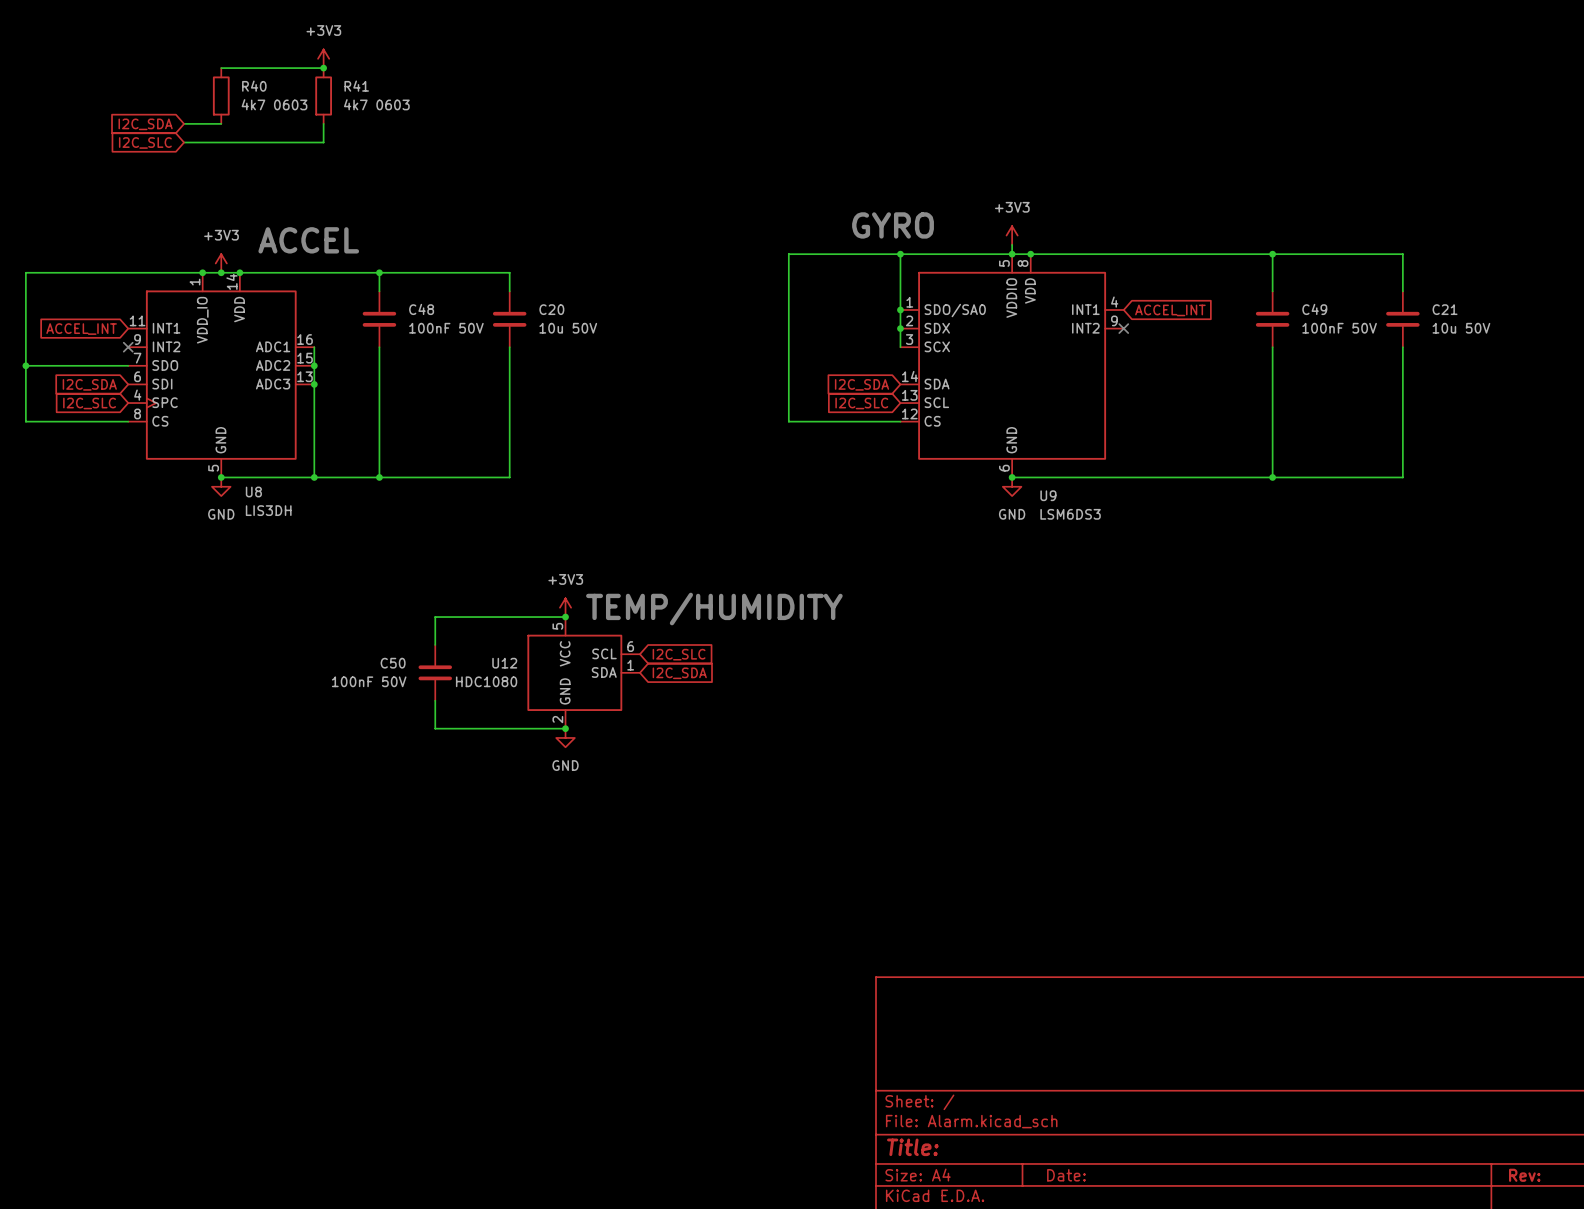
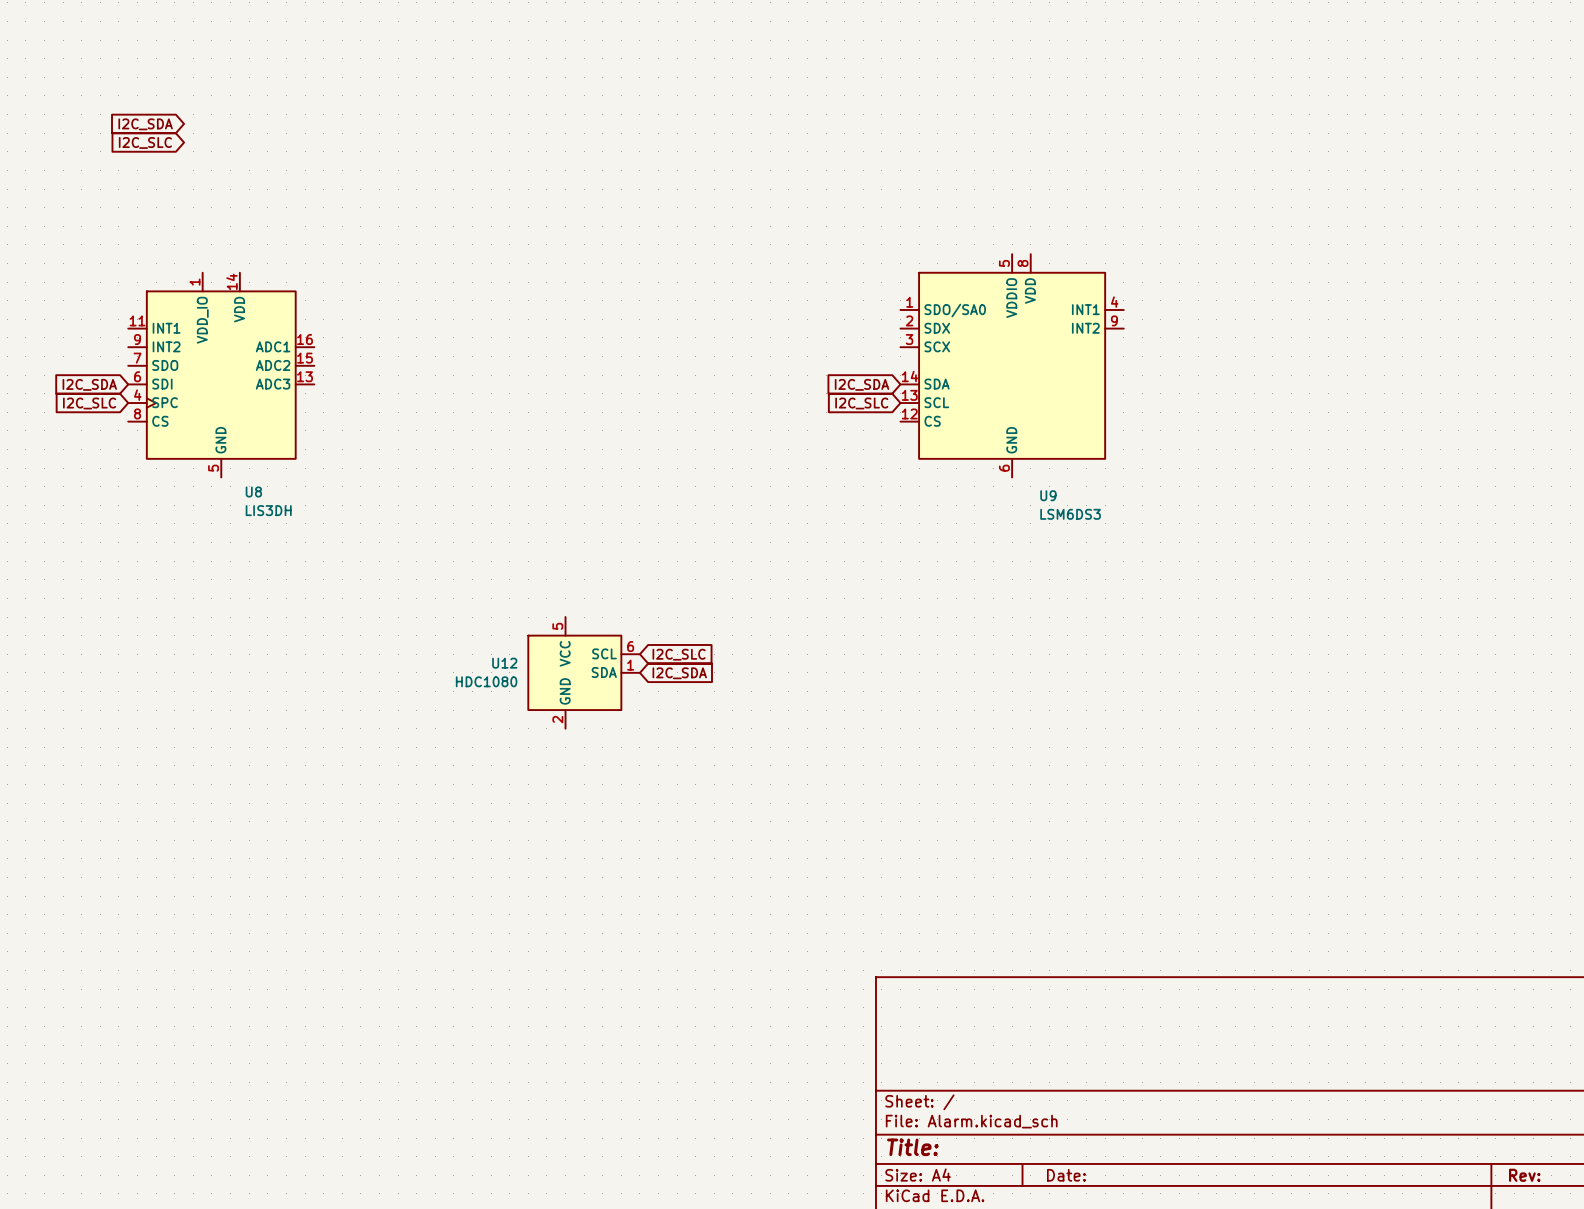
power symbol: +3V3 (323, 58) -> none
wire: (221, 68) (323, 68) -> none
junction: (323, 68) -> none
R40: 4k7 0603 (221, 95) -> none
R41: 4k7 0603 (323, 95) -> none
wire: (184, 123) (221, 123) -> none
wire: (323, 123) (323, 142) (184, 142) -> none
text: GYRO (893, 225) -> none
power symbol: +3V3 (1012, 235) -> none
text: ACCEL (308, 240) -> none
wire: (1012, 244) (1012, 254) -> none
wire: (900, 254) (900, 347) -> none
junction: (900, 254) -> none
junction: (1012, 254) -> none
junction: (1030, 254) -> none
wire: (1272, 254) (1272, 291) -> none
junction: (1272, 254) -> none
power symbol: +3V3 (221, 263) -> none
junction: (202, 272) -> none
junction: (221, 272) -> none
junction: (239, 272) -> none
wire: (379, 272) (379, 291) -> none
junction: (379, 272) -> none
wire: (509, 291) (509, 272) (25, 272) (25, 421) (128, 421) -> none
wire: (1402, 291) (1402, 254) (788, 254) (788, 421) (900, 421) -> none
junction: (900, 309) -> none
global label: ACCEL_INT (1170, 310) -> none
C48: 100nF 50V (379, 319) -> none
C20: 10u 50V (509, 319) -> none
C49: 100nF 50V (1272, 319) -> none
C21: 10u 50V (1402, 319) -> none
junction: (900, 328) -> none
no-connect mark: (1123, 328) -> none
global label: ACCEL_INT (81, 329) -> none
no-connect mark: (128, 347) -> none
wire: (314, 347) (314, 477) -> none
wire: (379, 347) (379, 477) -> none
wire: (509, 347) (509, 477) (221, 477) -> none
wire: (1272, 347) (1272, 477) -> none
wire: (1402, 347) (1402, 477) (1012, 477) -> none
wire: (25, 365) (128, 365) -> none
junction: (25, 365) -> none
junction: (314, 365) -> none
junction: (314, 384) -> none
junction: (221, 477) -> none
junction: (314, 477) -> none
junction: (379, 477) -> none
junction: (1012, 477) -> none
junction: (1272, 477) -> none
power symbol: GND (221, 486) -> none
power symbol: GND (1012, 486) -> none
power symbol: +3V3 (565, 607) -> none
text: TEMP/HUMIDITY (714, 609) -> none
wire: (565, 617) (435, 617) (435, 644) -> none
junction: (565, 617) -> none
C50: 100nF 50V (435, 672) -> none
wire: (435, 700) (435, 728) (565, 728) -> none
junction: (565, 728) -> none
power symbol: GND (565, 737) -> none

